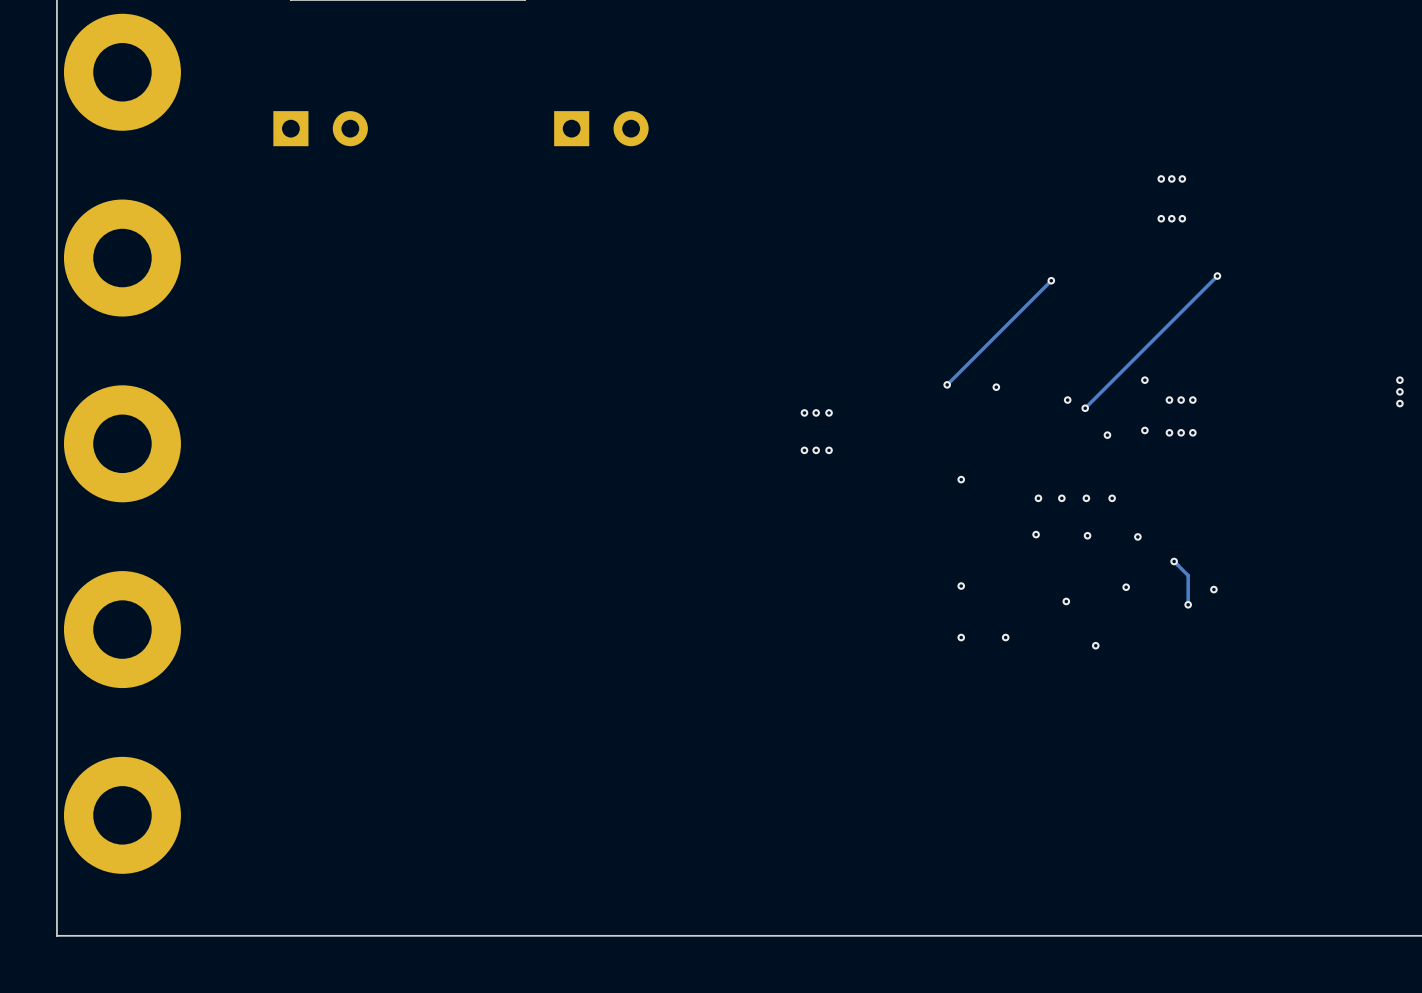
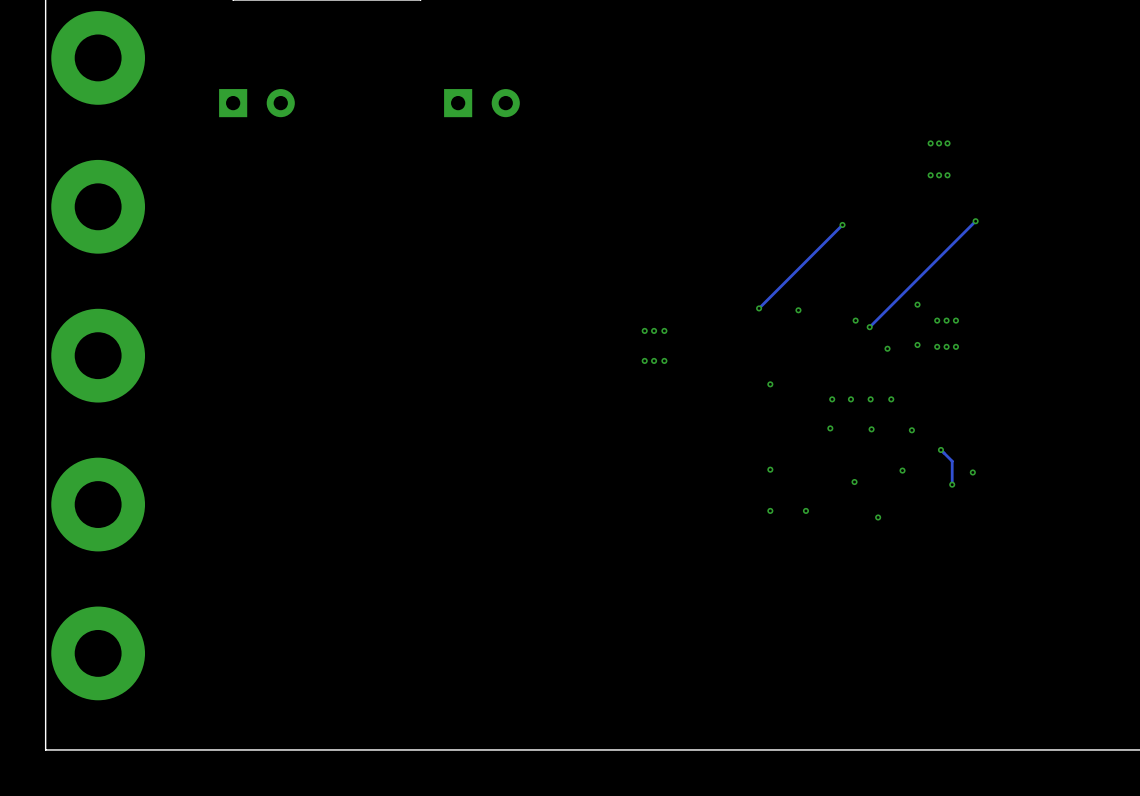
via: (1399, 380) -> none
via: (1399, 391) -> none
via: (1399, 403) -> none

